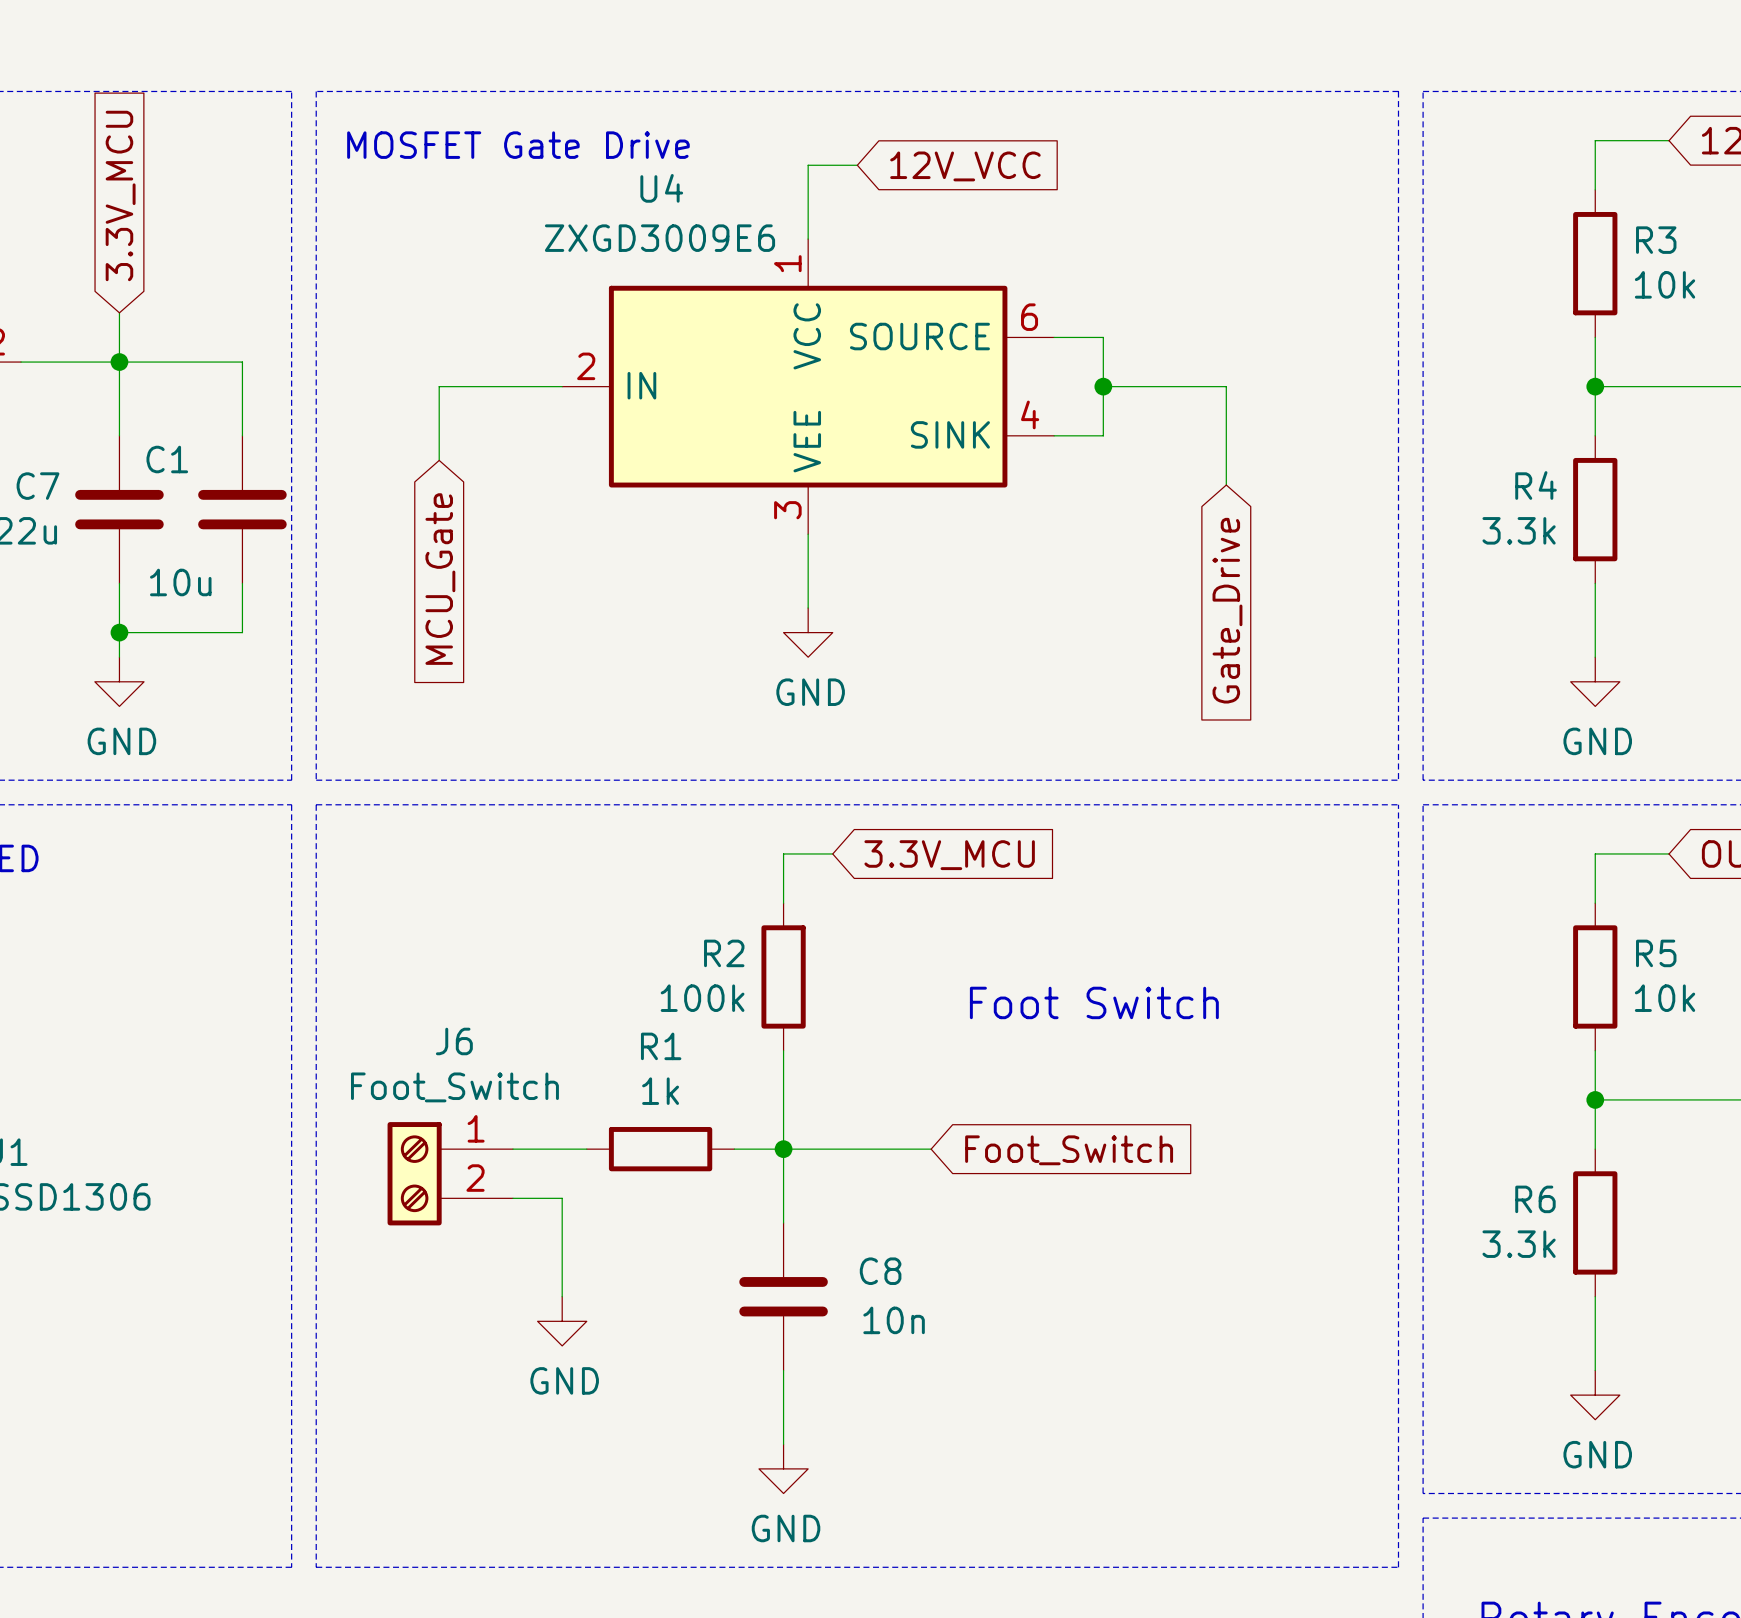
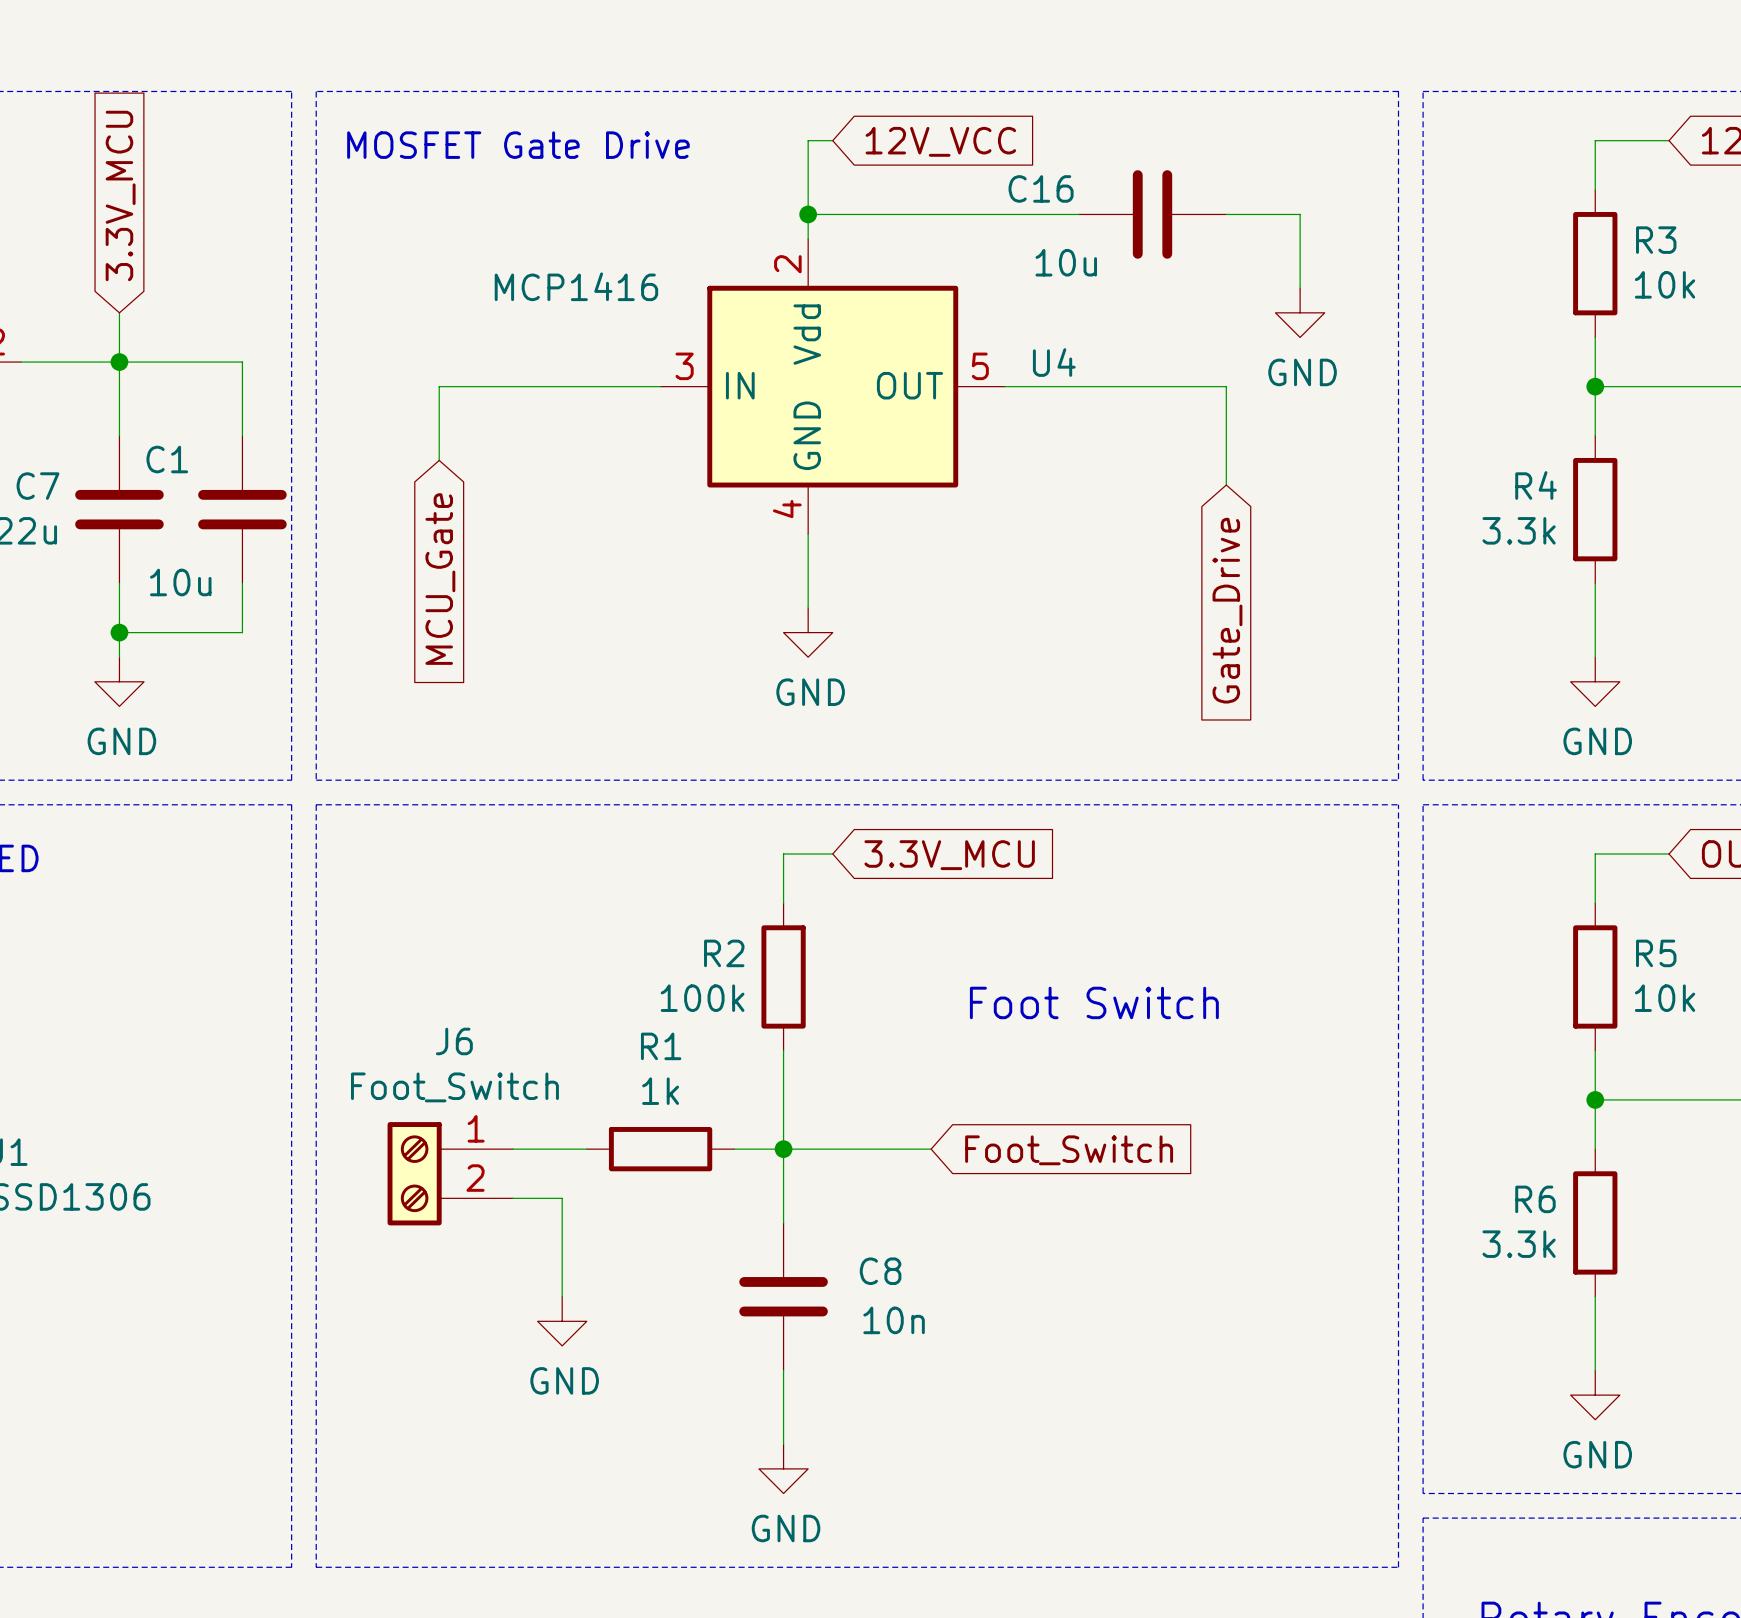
wire: (808, 165) (857, 165) -> (808, 165) (808, 140) (832, 140)
global label position: 12V_VCC (965, 166) -> 12V_VCC (940, 141)
U4 name position: U4 (661, 188) -> U4 (1054, 362)
wire: none -> (808, 214) (1078, 214)
junction: none -> (808, 214)
C16: none -> 10u (1152, 214)
wire: none -> (1226, 214) (1300, 214) (1300, 288)
U4 value: ZXGD3009E6 (659, 238) -> MCP1416 (576, 286)
U4 symbol: [562, 239, 1055, 535] -> [660, 239, 1005, 535]
power symbol: none -> GND (1300, 312)
wire: (1054, 337) (1103, 337) (1103, 435) (1054, 435) -> none
wire: none -> (1004, 386) (1103, 386)
junction: (1103, 386) -> none

